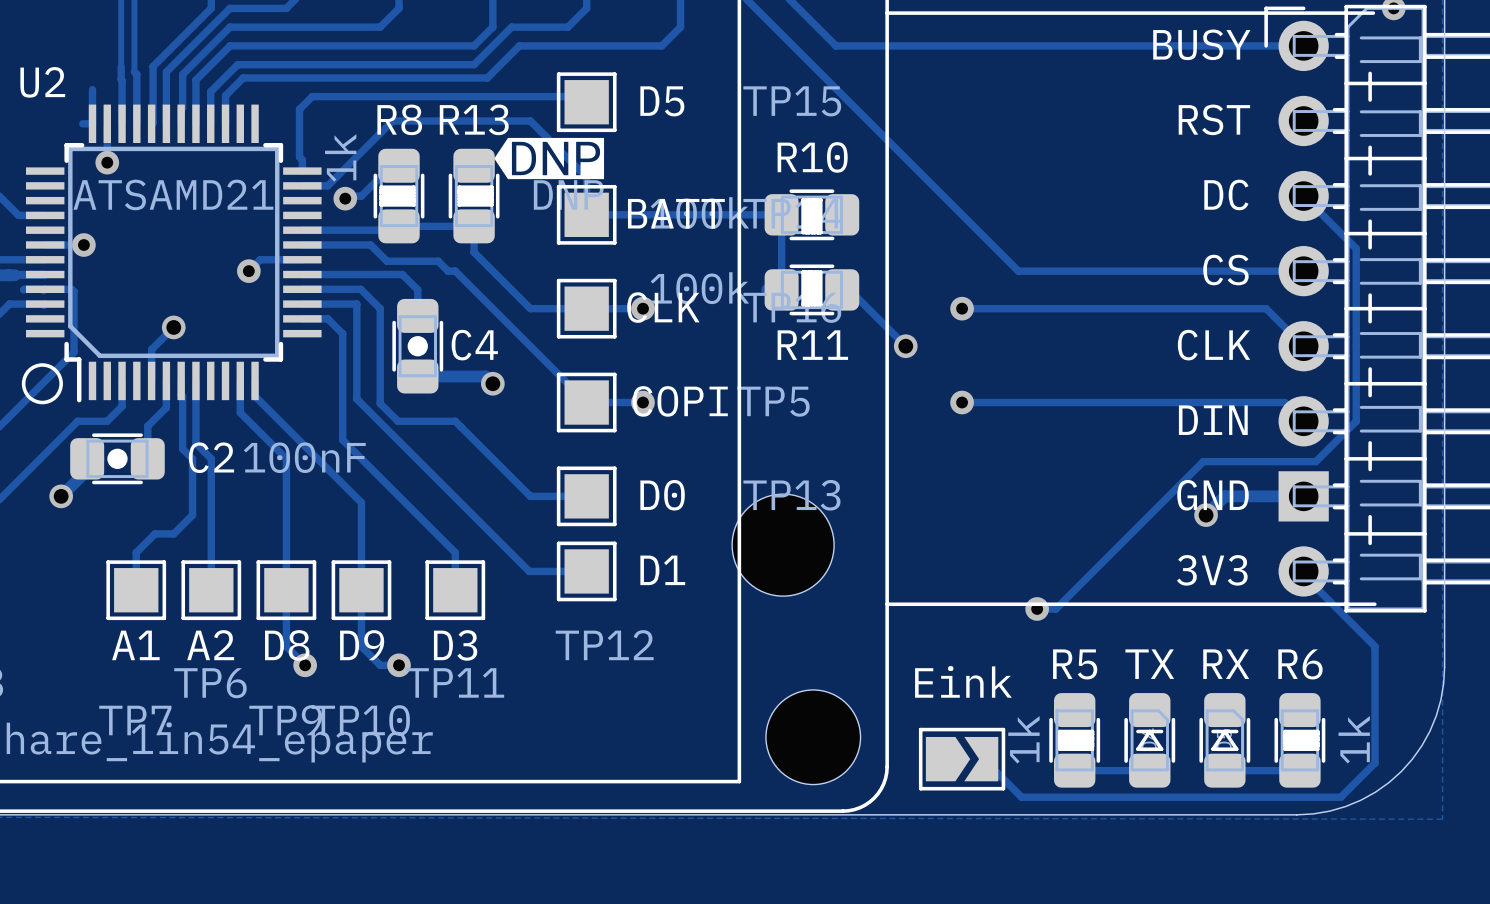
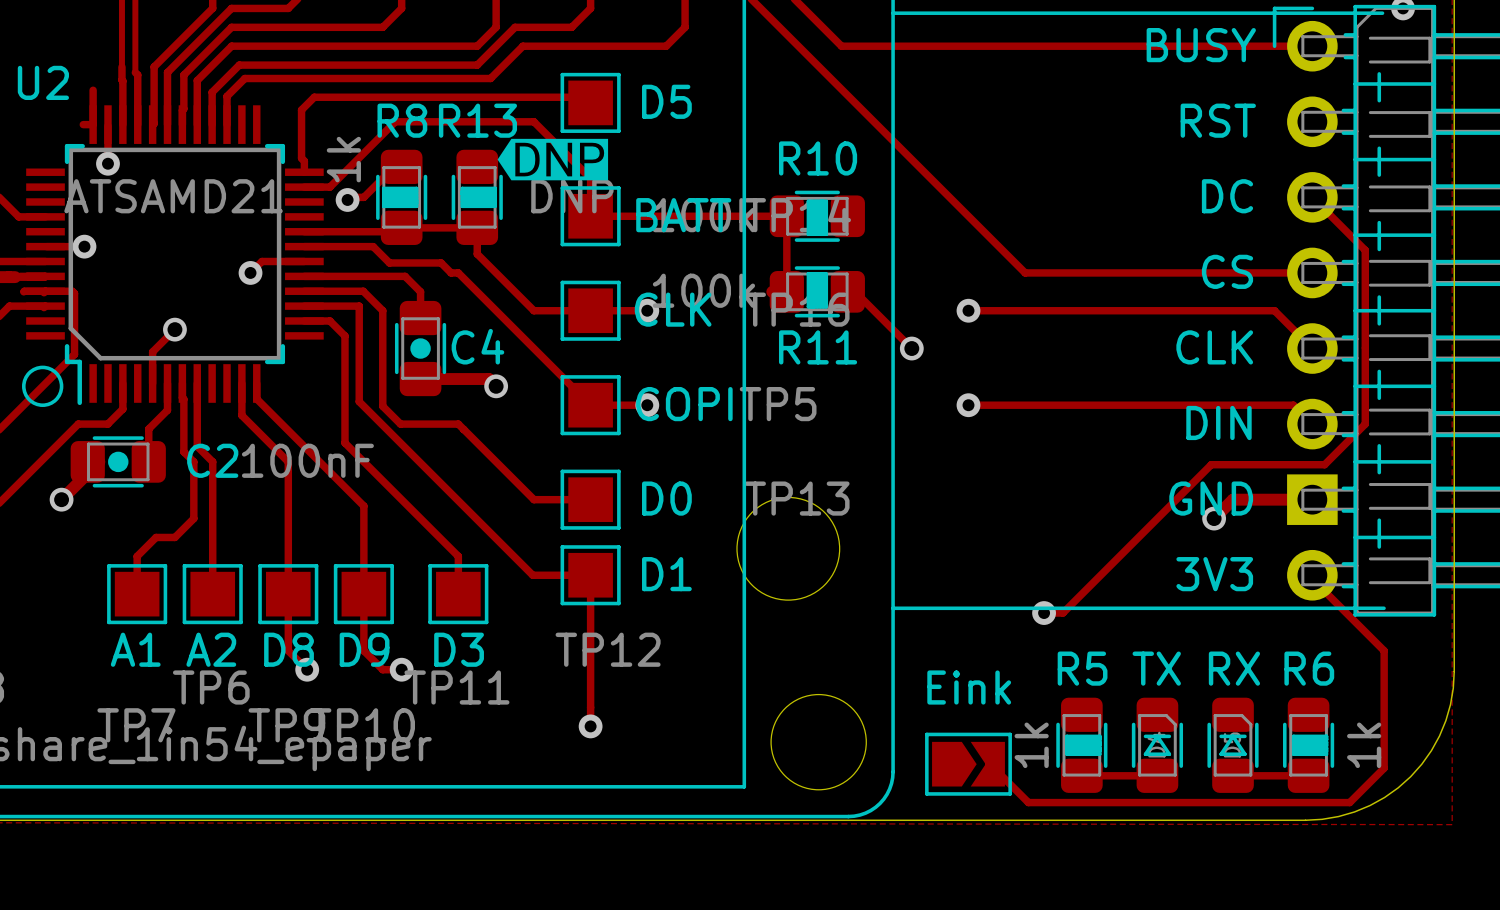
TP15 name: TP15 (792, 101) -> none
track: none -> (590, 575) (590, 726)
via: none -> (590, 726)

